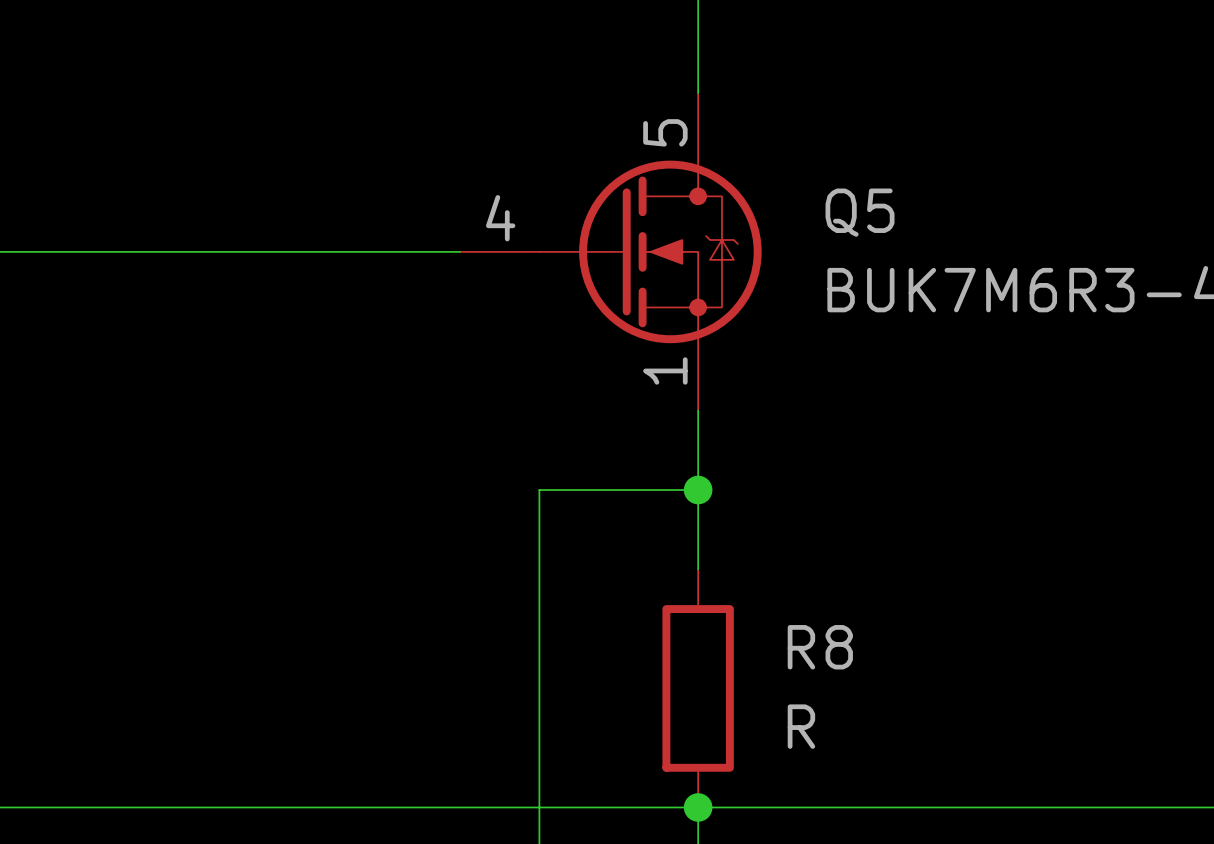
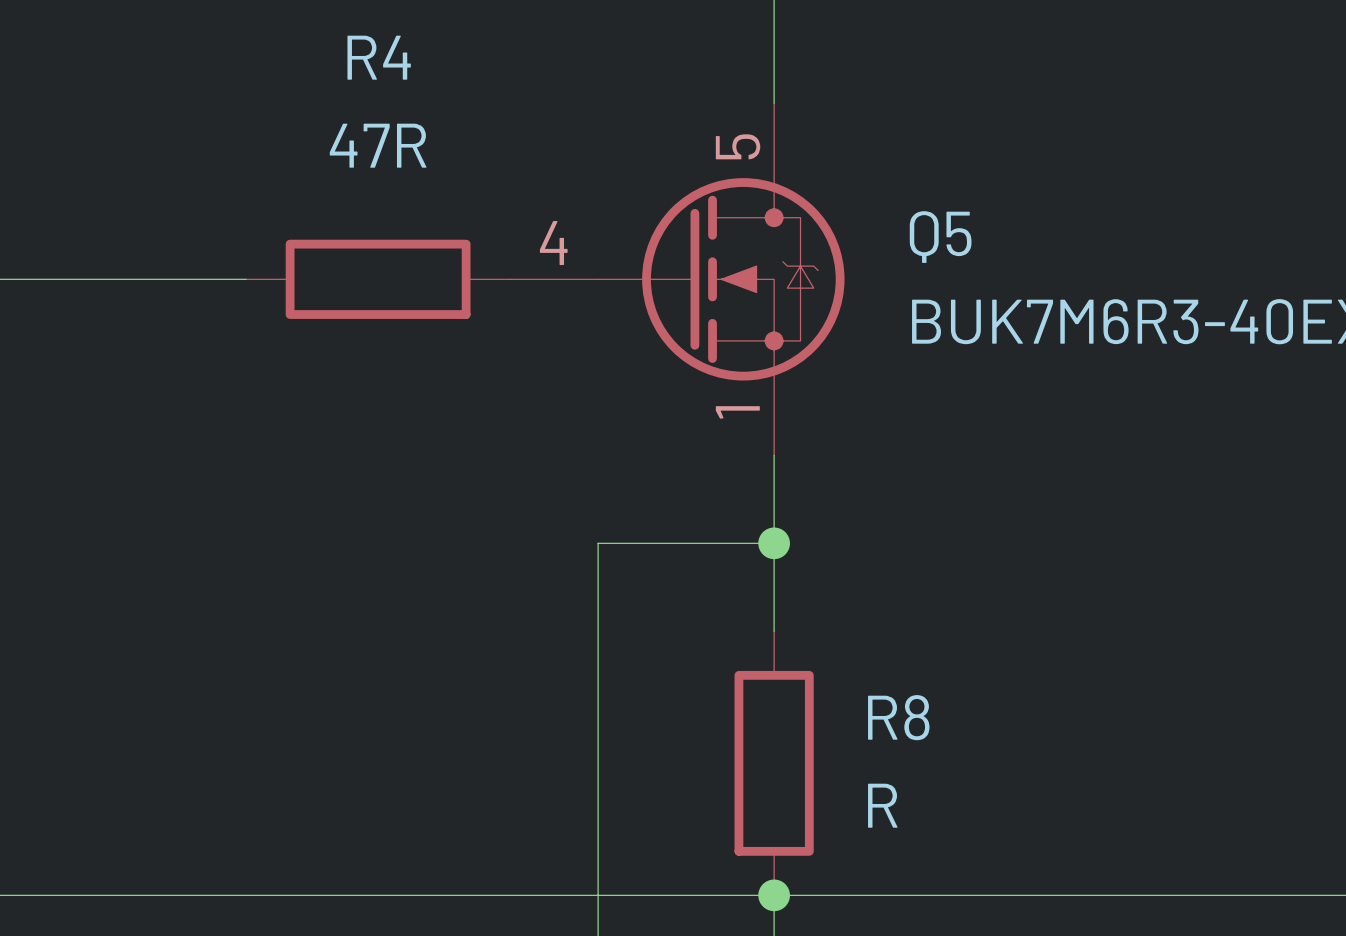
wire: (221, 251) (460, 251) -> none
R4: none -> 47R (378, 279)

